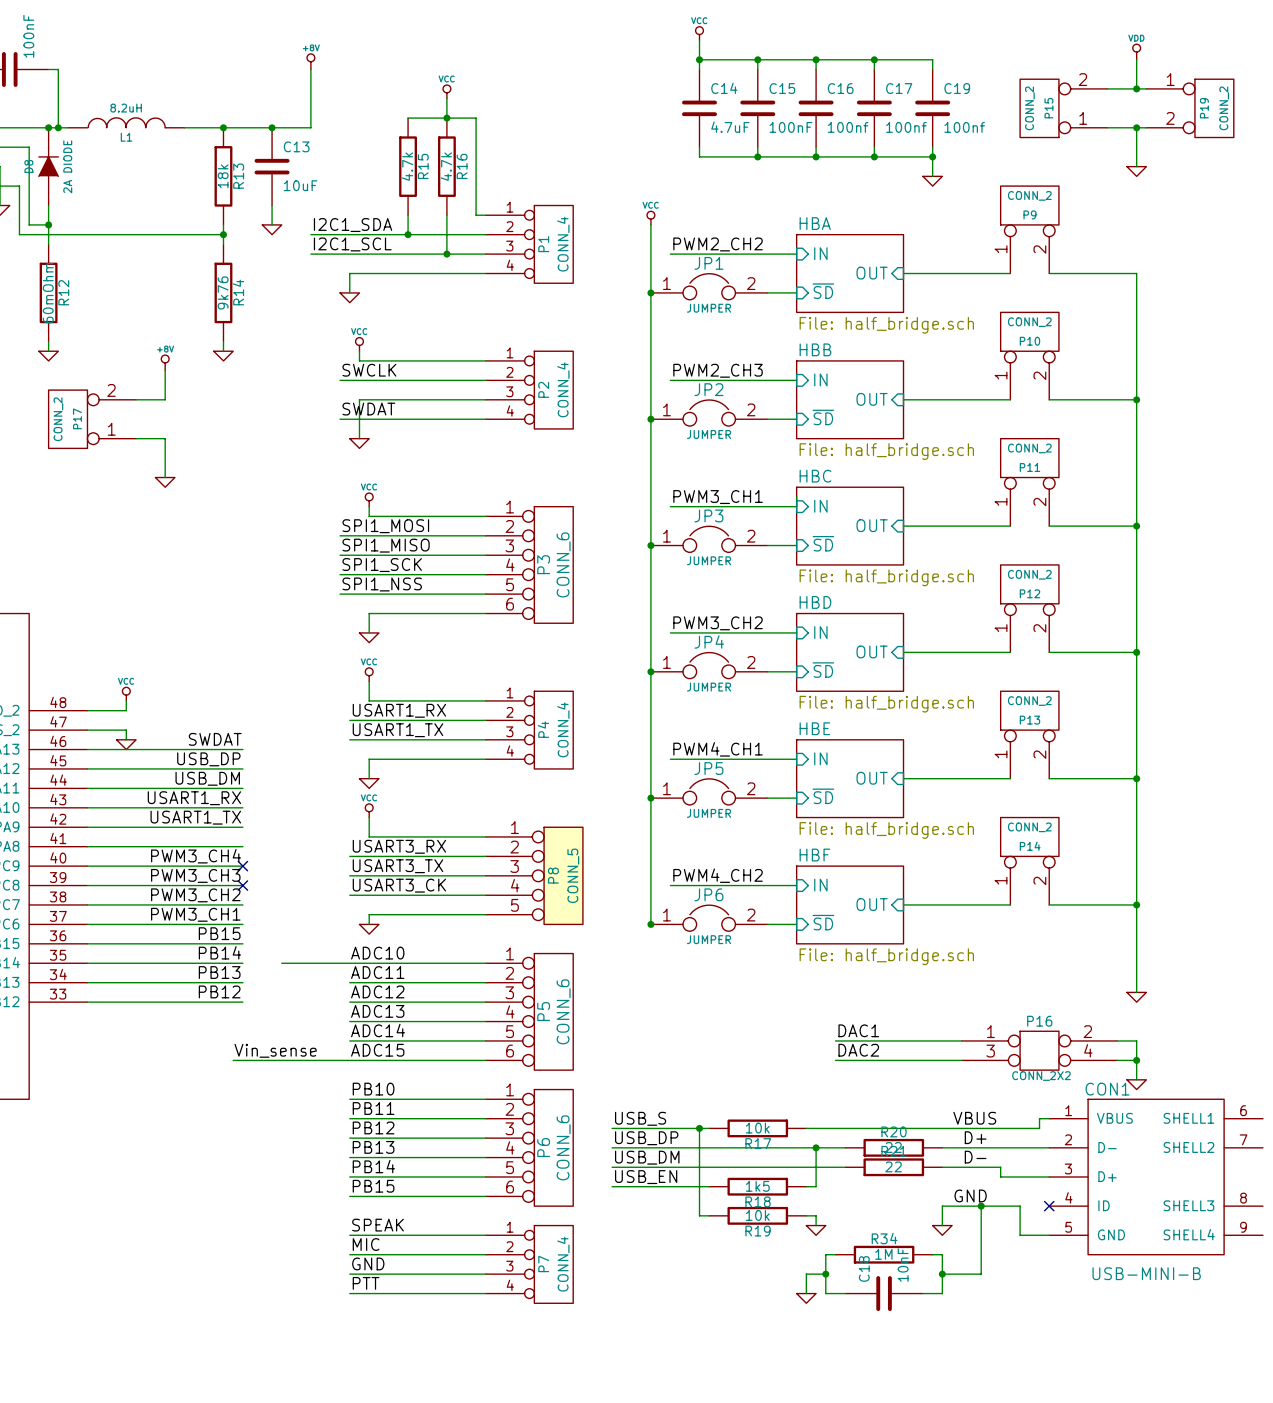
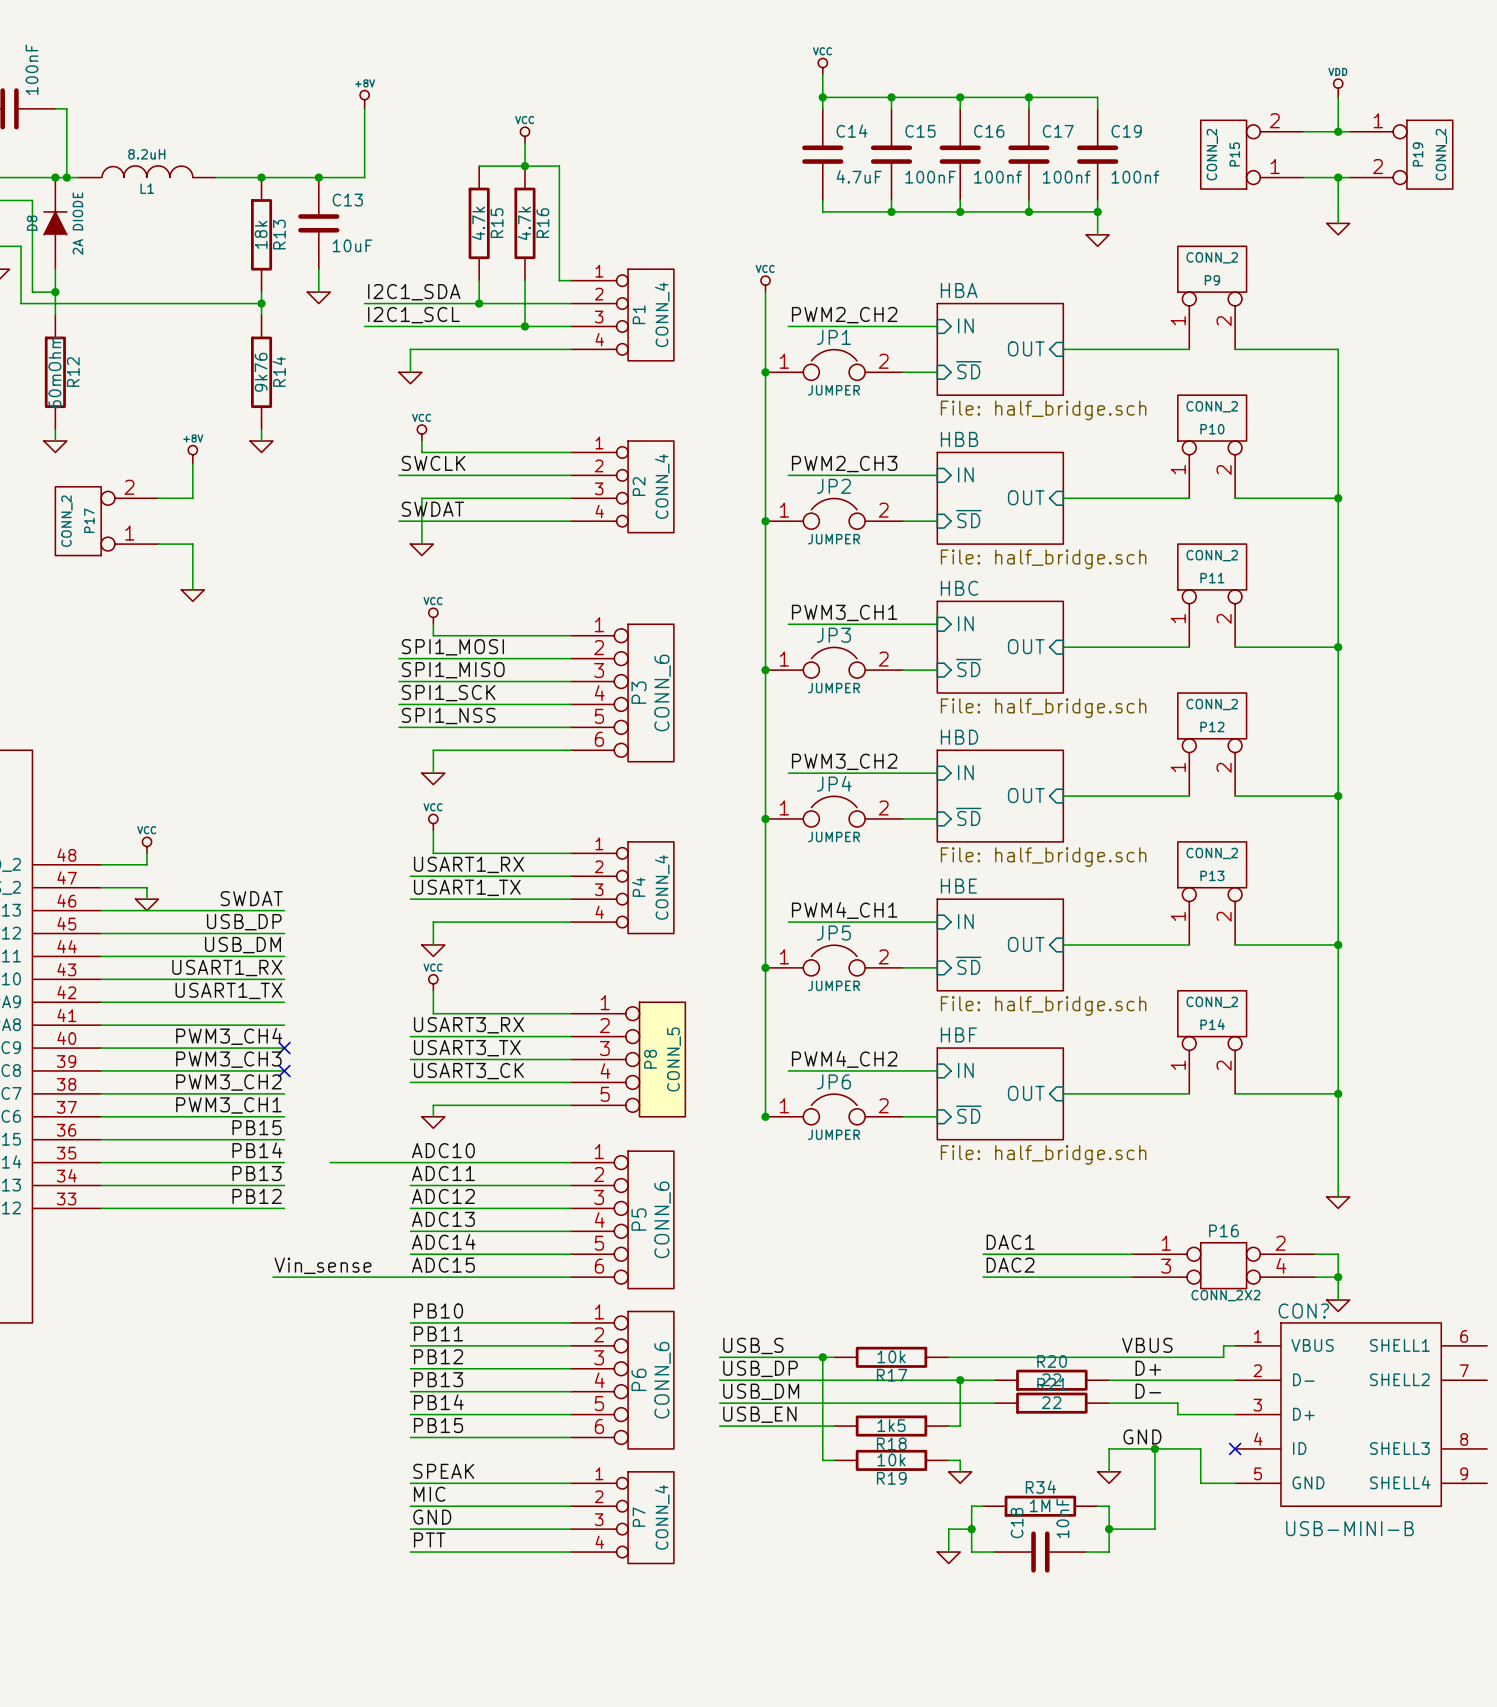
CON1 name: CON1 (1107, 1089) -> CON? (1303, 1310)

